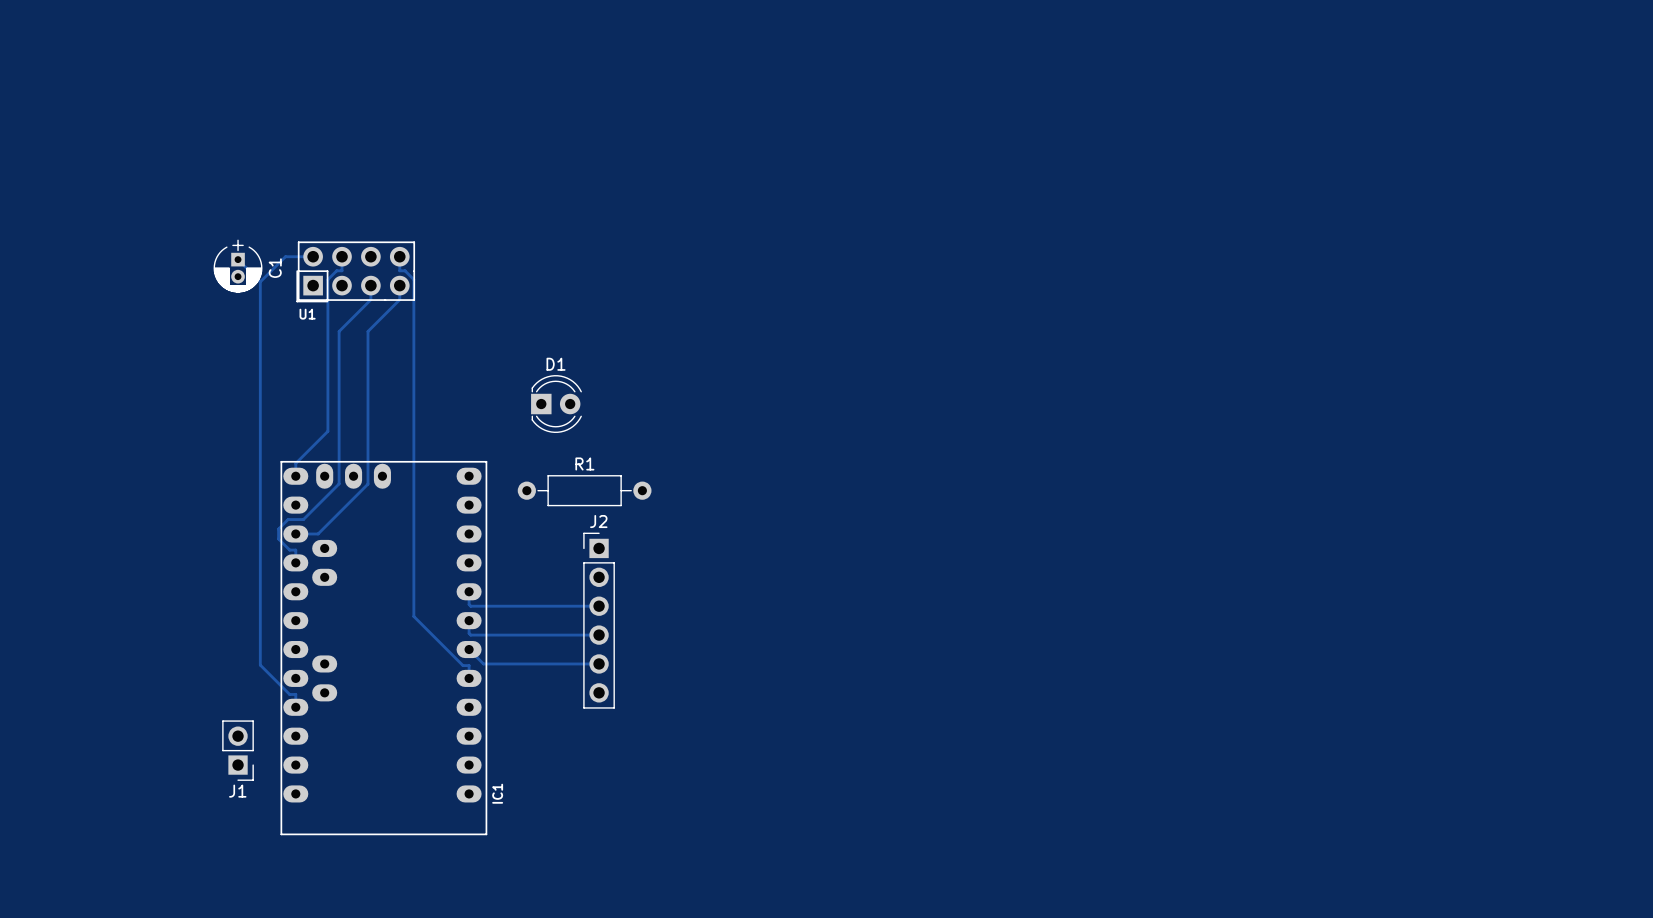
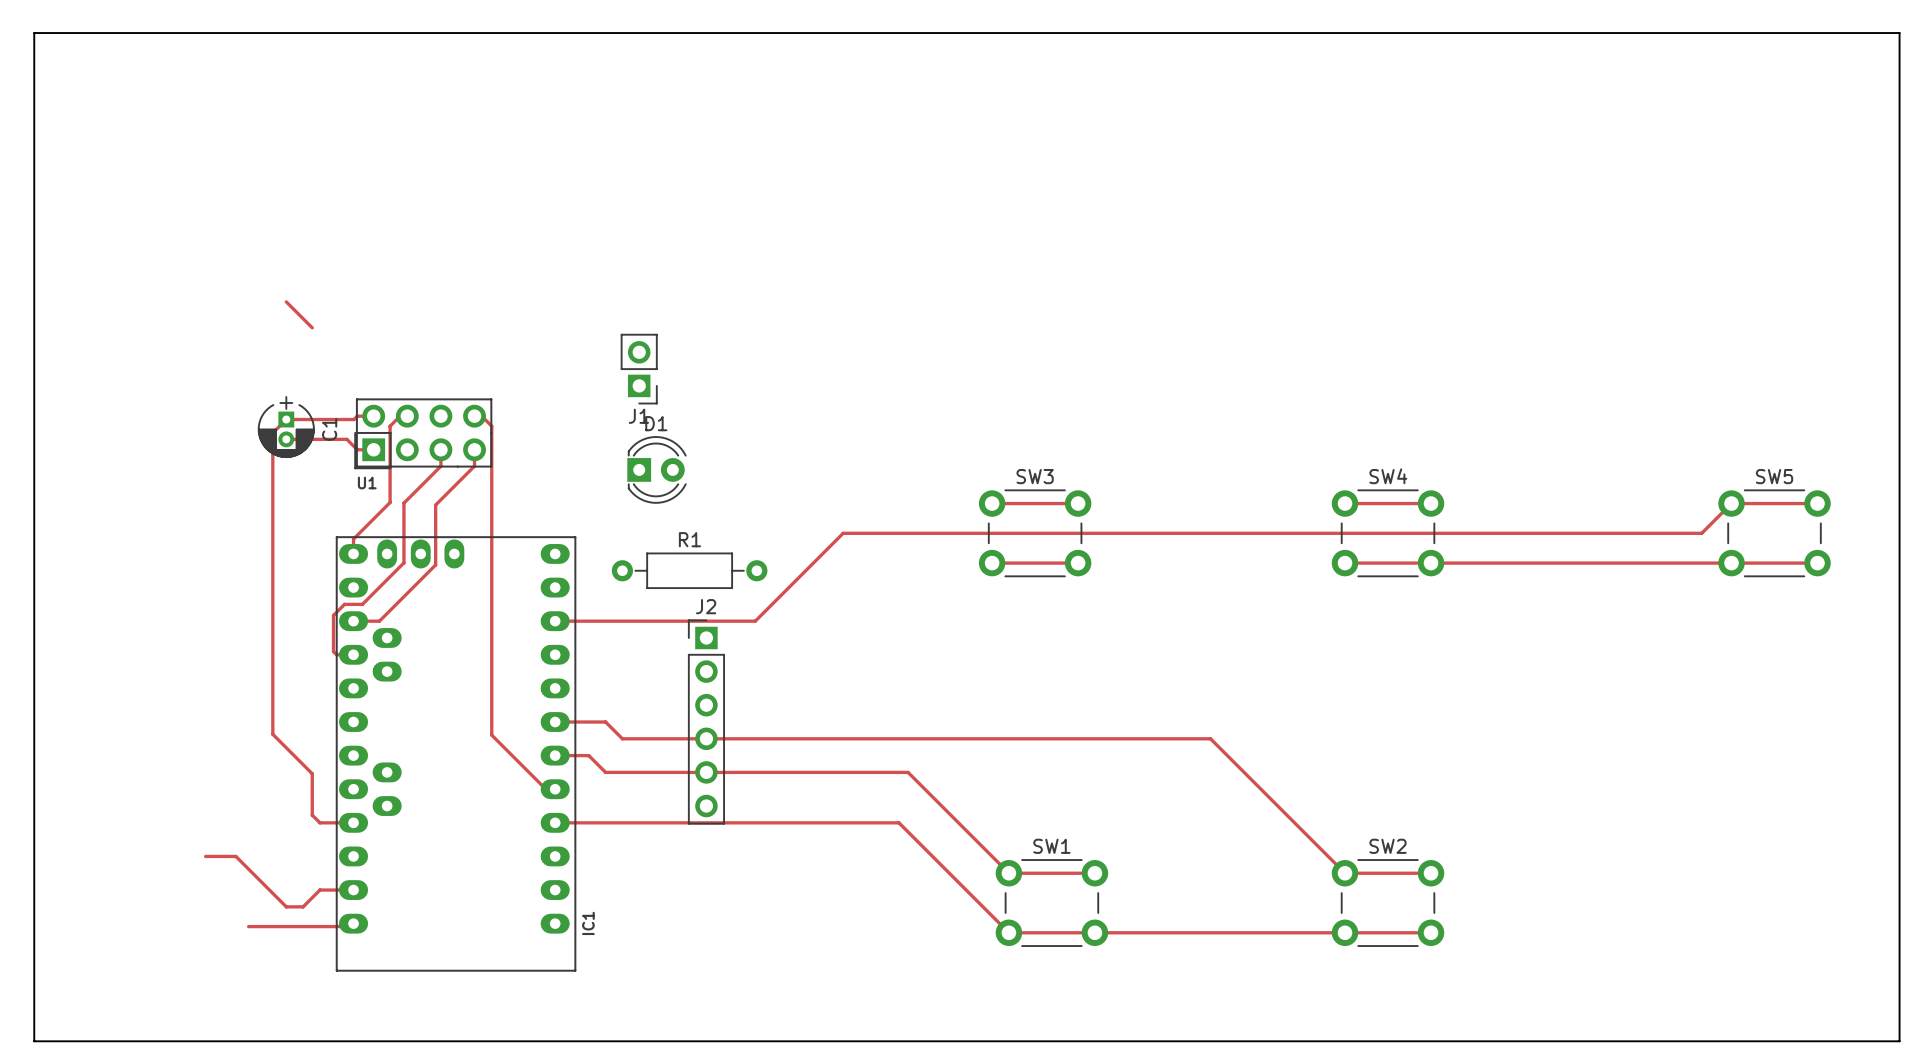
board edge: none -> (34, 33) (34, 1041) (1899, 1041) (1899, 33) (34, 33)
track: (313, 256) (285, 256) (260, 281) (260, 665) (289, 694) (295, 694) (295, 707) -> (373, 416) (357, 416) (353, 419) (286, 419) (272, 433) (272, 734) (312, 773) (312, 815) (319, 822) (353, 822)
track: (342, 256) (342, 270) (336, 270) (327, 279) (327, 432) -> (400, 415) (390, 426) (390, 502)
track: (399, 256) (399, 270) (405, 270) (413, 279) (413, 616) (463, 665) (469, 665) (469, 678) -> (481, 415) (491, 426) (491, 735) (547, 791) (555, 789)
C1 position: (238, 266) -> (286, 427)
U1 position: (355, 271) -> (423, 433)
track: (370, 285) (370, 299) (339, 331) (339, 432) -> (440, 449) (440, 466) (403, 503)
track: (399, 285) (399, 299) (368, 331) (368, 484) (366, 485) -> (474, 449) (474, 466) (435, 505) (435, 564)
track: none -> (286, 439) (346, 439) (357, 449) (373, 449)
track: none -> (992, 503) (1078, 503)
track: none -> (1345, 503) (1431, 503)
track: none -> (1817, 503) (1731, 503) (1701, 533) (843, 533) (755, 621) (555, 621)
SW3: none -> (1035, 533)
SW4: none -> (1388, 533)
SW5: none -> (1774, 533)
track: none -> (992, 563) (1078, 563)
track: none -> (1345, 563) (1817, 563)
track: (278, 538) (289, 550) (295, 550) (295, 562) -> (333, 626) (333, 651) (336, 654) (353, 654)
track: (469, 591) (470, 606) (599, 606) -> none
track: (469, 620) (470, 635) (526, 635) -> (555, 722) (605, 722) (622, 738)
track: none -> (706, 738) (1210, 738) (1345, 873) (1431, 873)
track: (469, 649) (483, 663) (512, 663) -> (555, 755) (588, 755) (605, 772)
track: none -> (706, 772) (908, 772) (1008, 873) (1094, 873)
track: none -> (555, 822) (898, 822) (1008, 932) (1431, 932)
track: none -> (205, 856) (235, 856) (286, 906) (303, 906) (319, 890) (353, 890)
J1 position: (238, 750) -> (639, 369)
SW1: none -> (1051, 903)
SW2: none -> (1388, 903)
track: none -> (353, 923) (350, 926) (248, 926)

